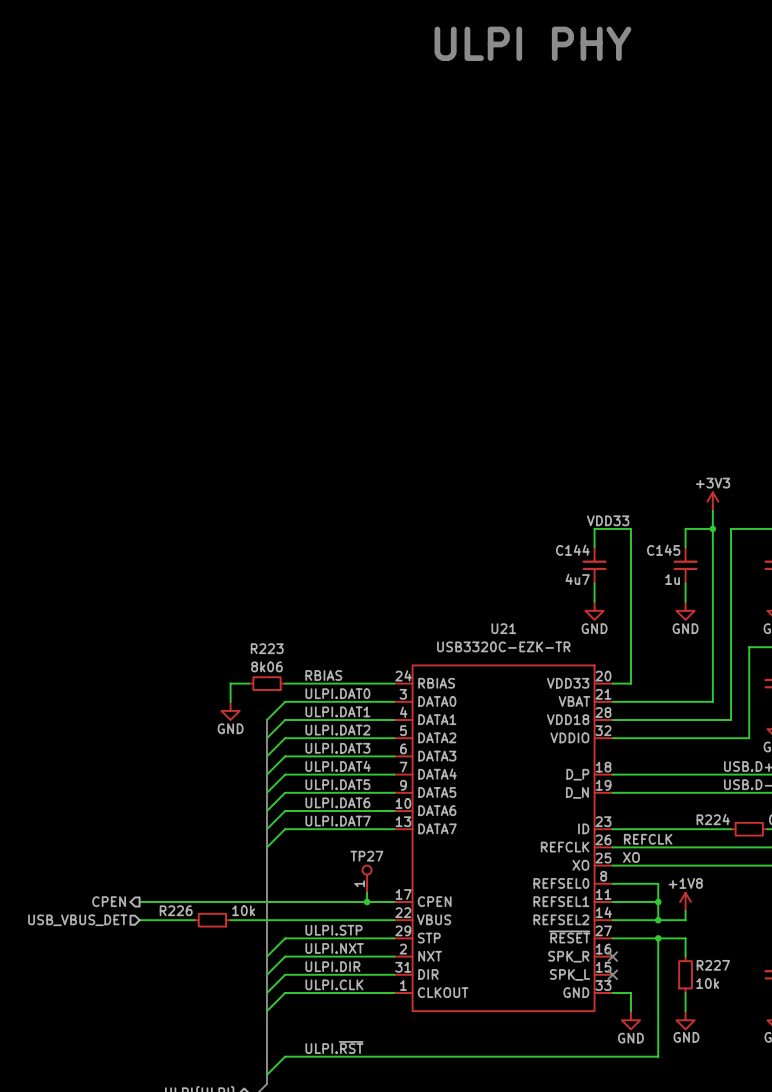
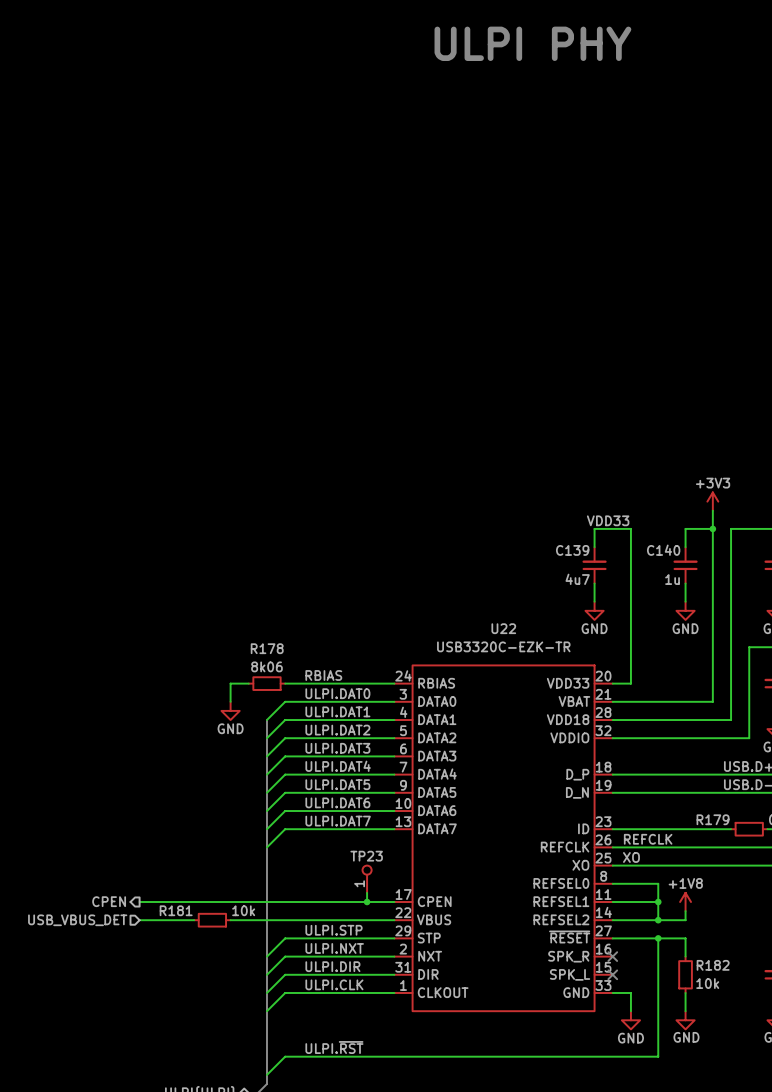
C144 name: C144 (572, 550) -> C139 (572, 550)
C145 name: C145 (663, 550) -> C140 (663, 550)
U21 name: U21 (503, 628) -> U22 (503, 628)
R223 name: R223 (267, 648) -> R178 (267, 648)
R224 name: R224 (713, 819) -> R179 (713, 819)
TP27 name: TP27 (366, 856) -> TP23 (366, 856)
R226 name: R226 (176, 910) -> R181 (176, 910)
R227 name: R227 (713, 965) -> R182 (713, 965)

